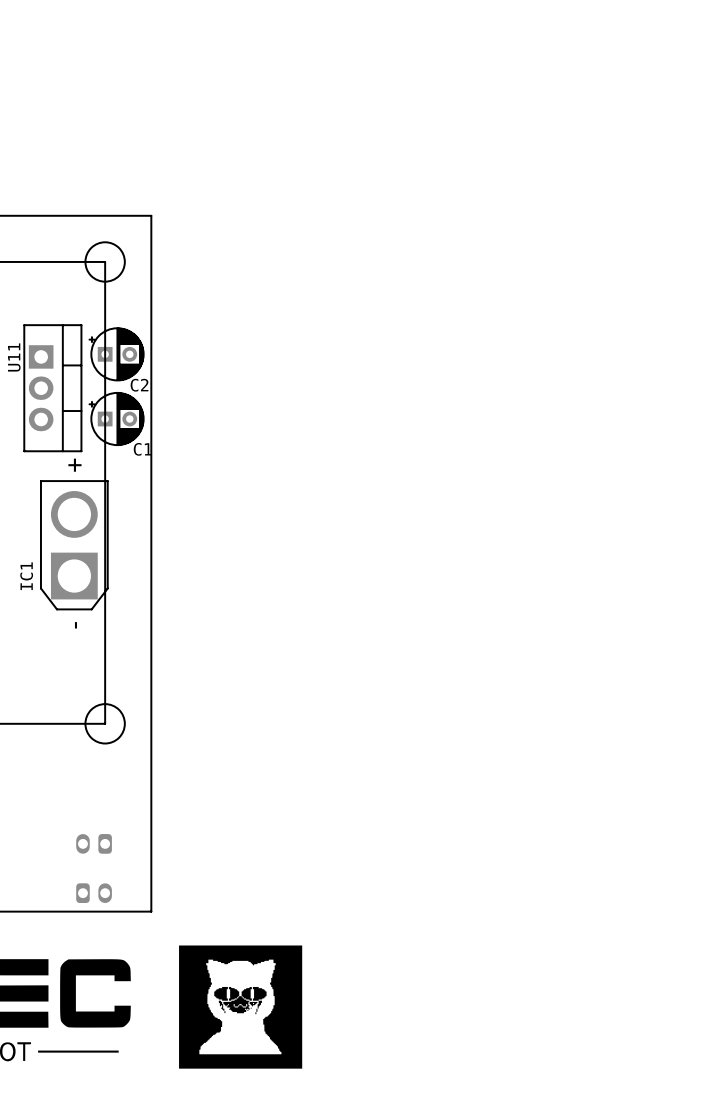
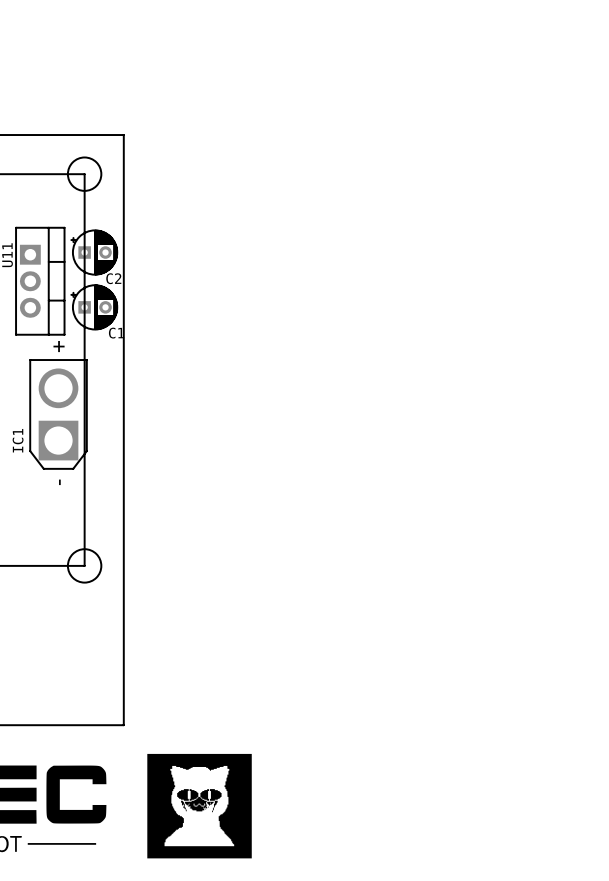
part: (94, 868) -> none

